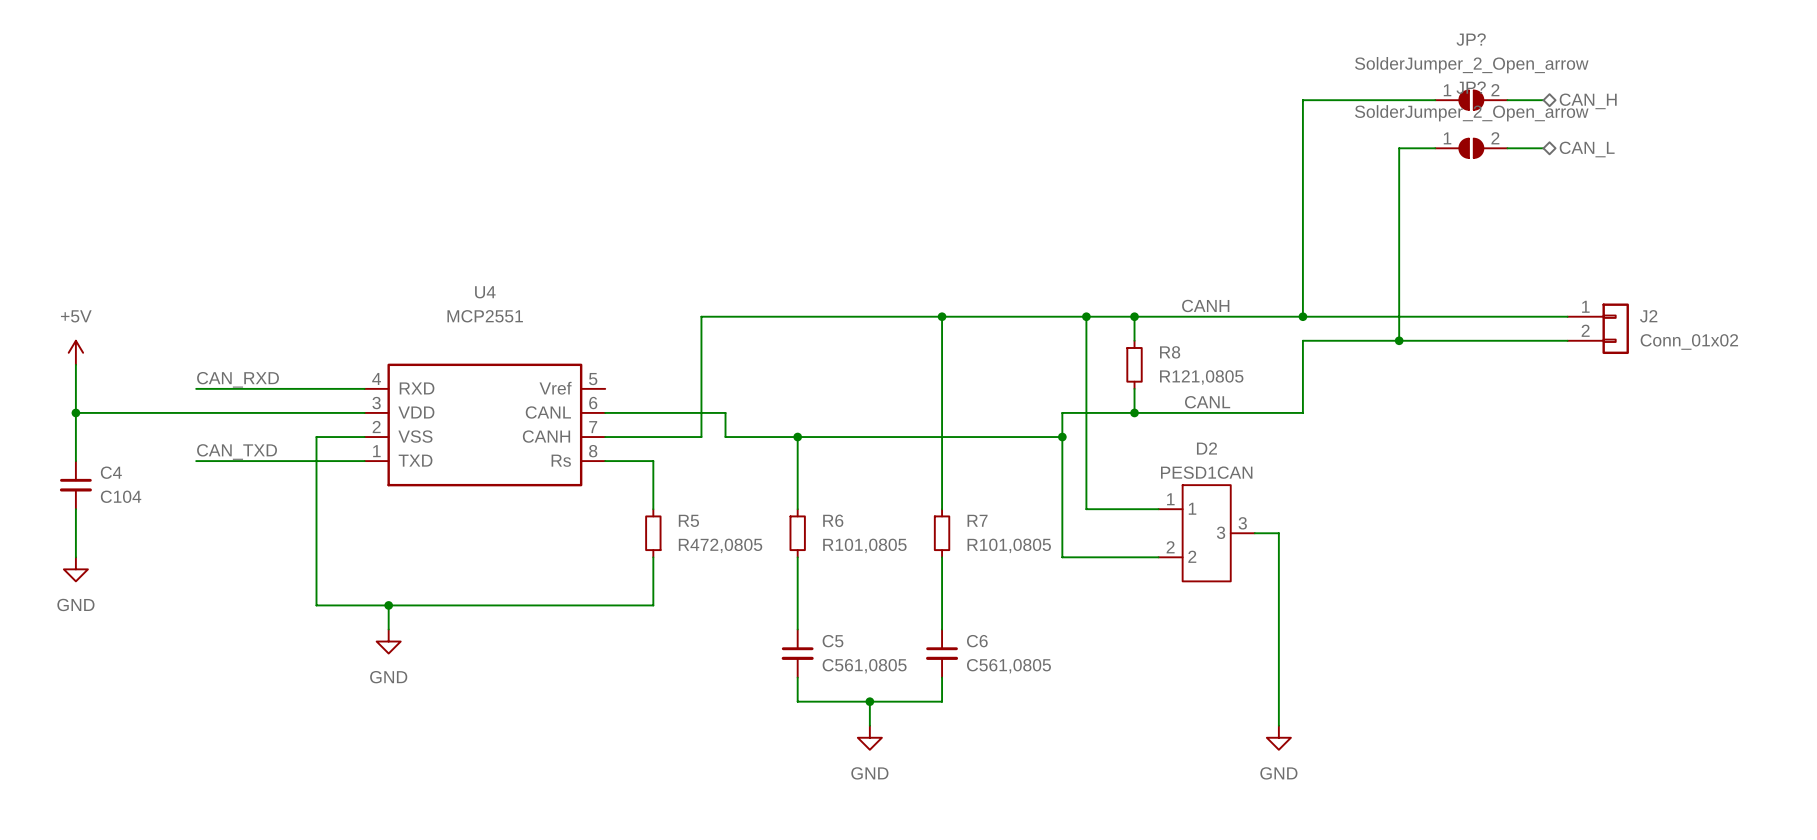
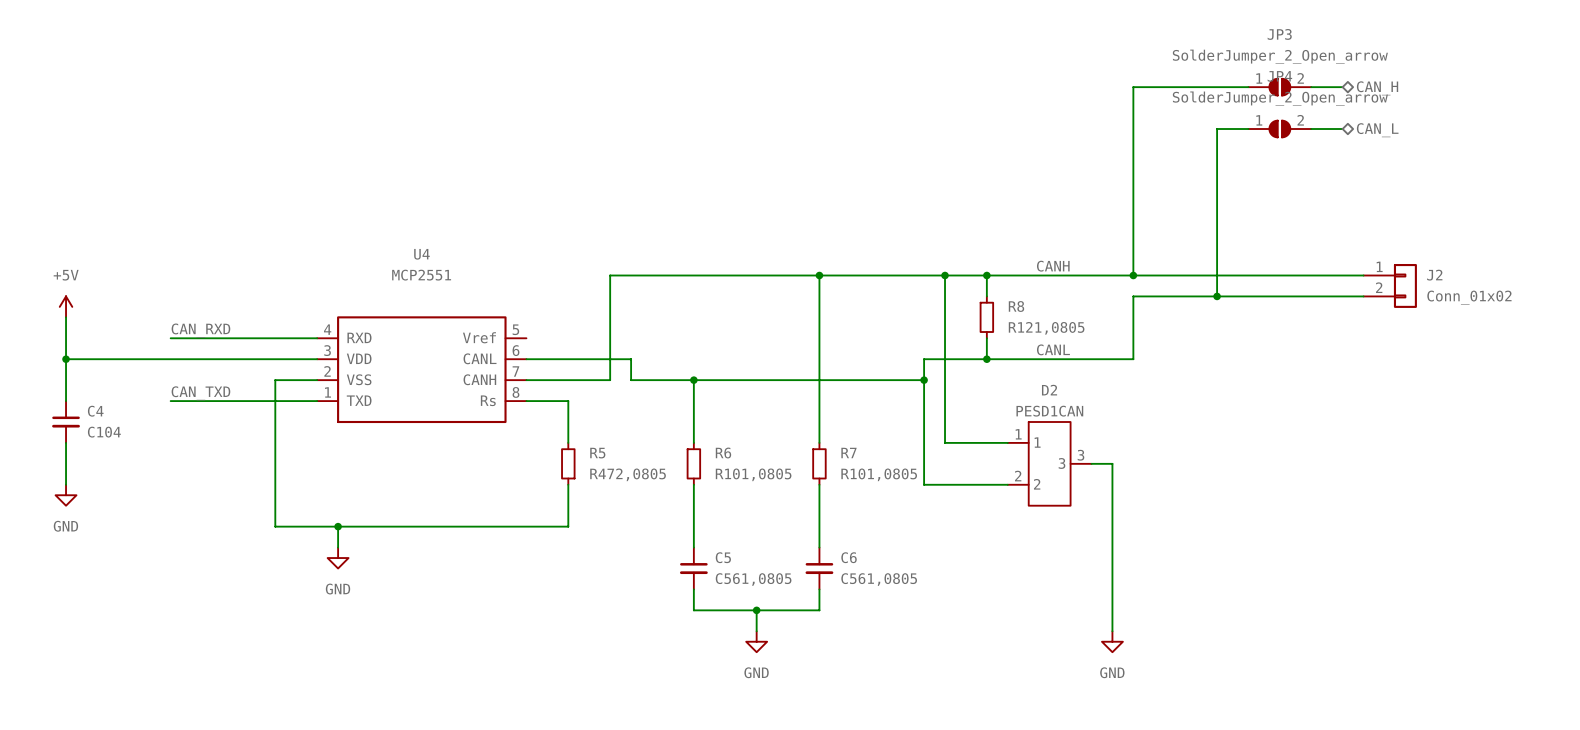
JP? name: JP? (1471, 39) -> JP3 (1279, 34)
JP? name: JP? (1471, 87) -> JP4 (1279, 76)

